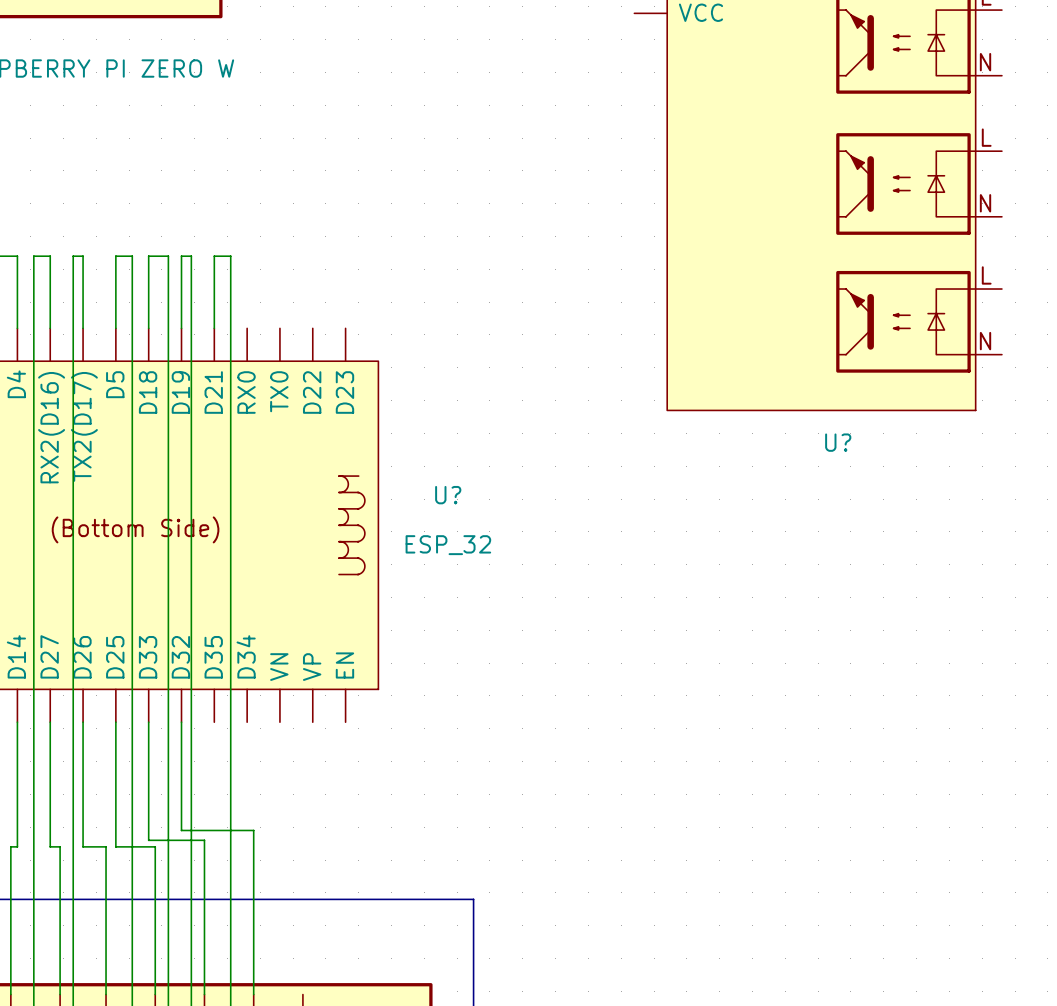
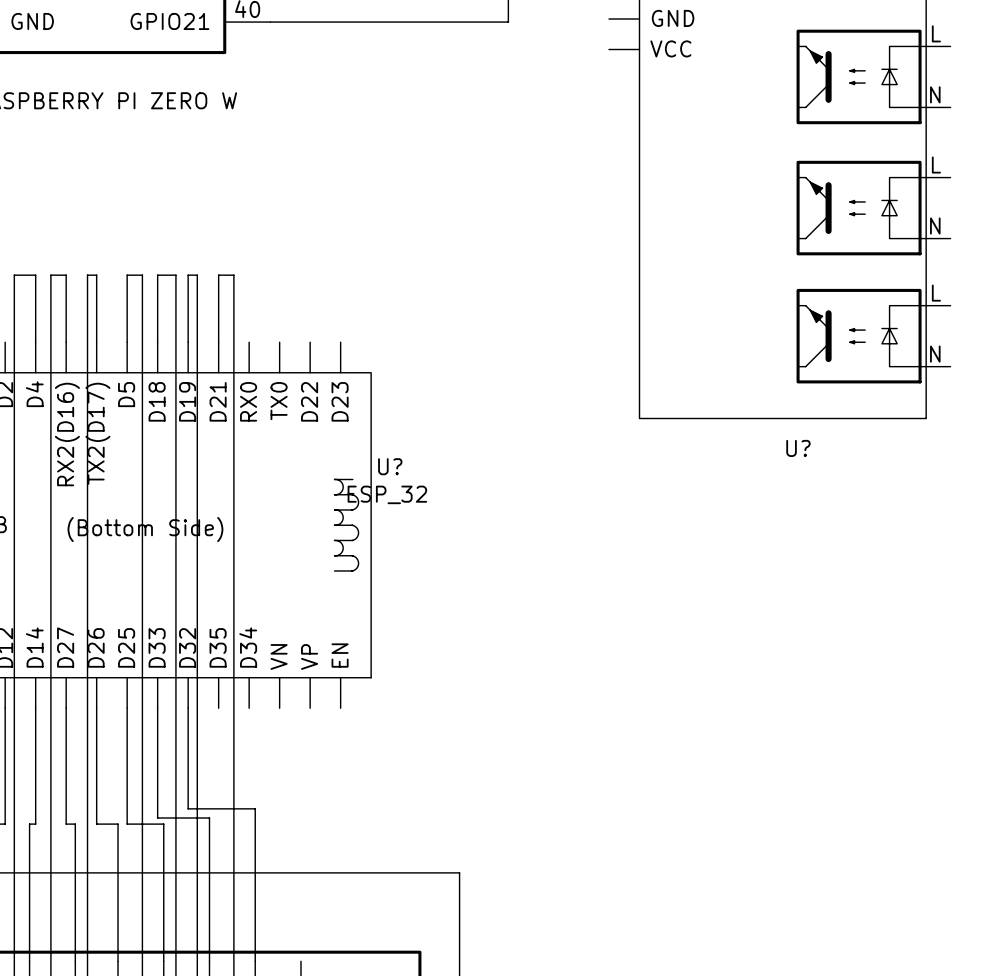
U? name position: U? (448, 495) -> U? (390, 466)
U? value position: ESP_32 (448, 545) -> ESP_32 (387, 494)

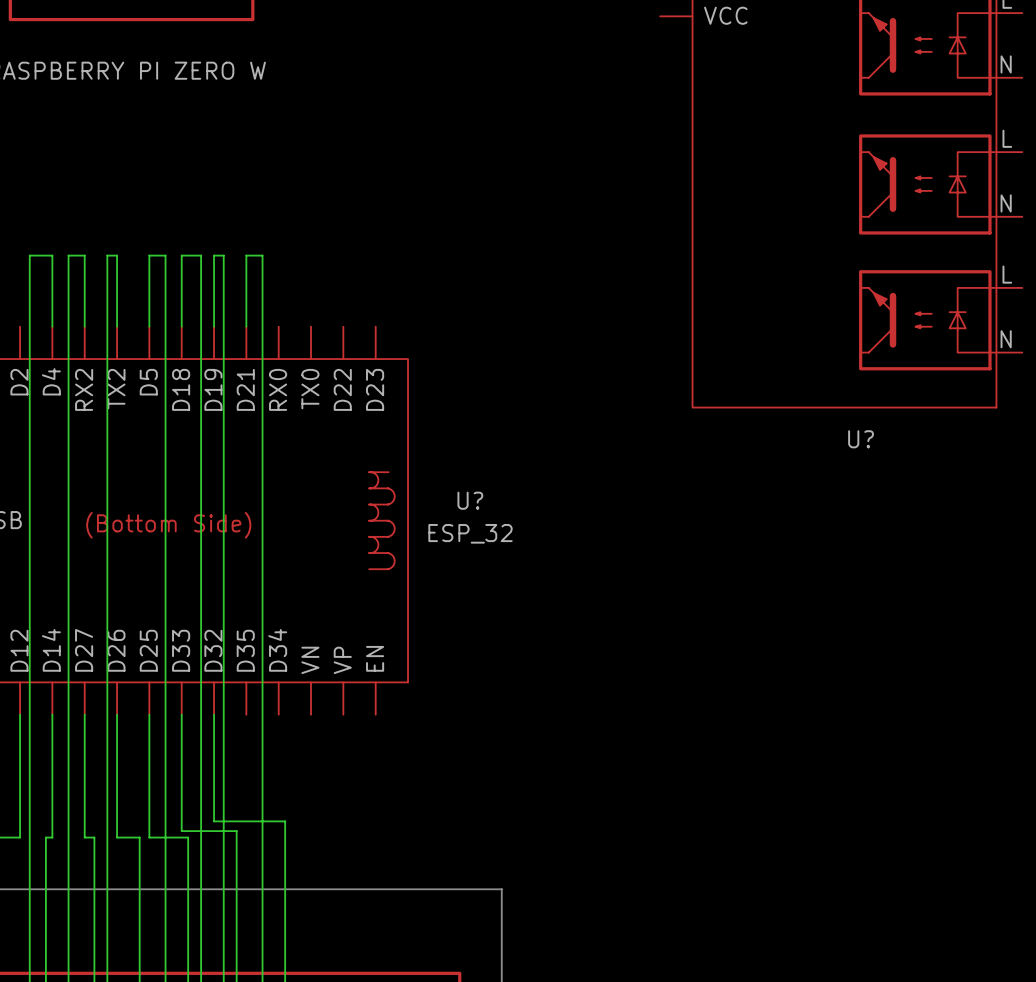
U? pin name: TX2(D17) (97, 433) -> TX2 (116, 389)
U? pin name: RX2(D16) (67, 434) -> RX2 (84, 389)
U? name position: U? (390, 466) -> U? (470, 500)
U? value position: ESP_32 (387, 494) -> ESP_32 (470, 533)

